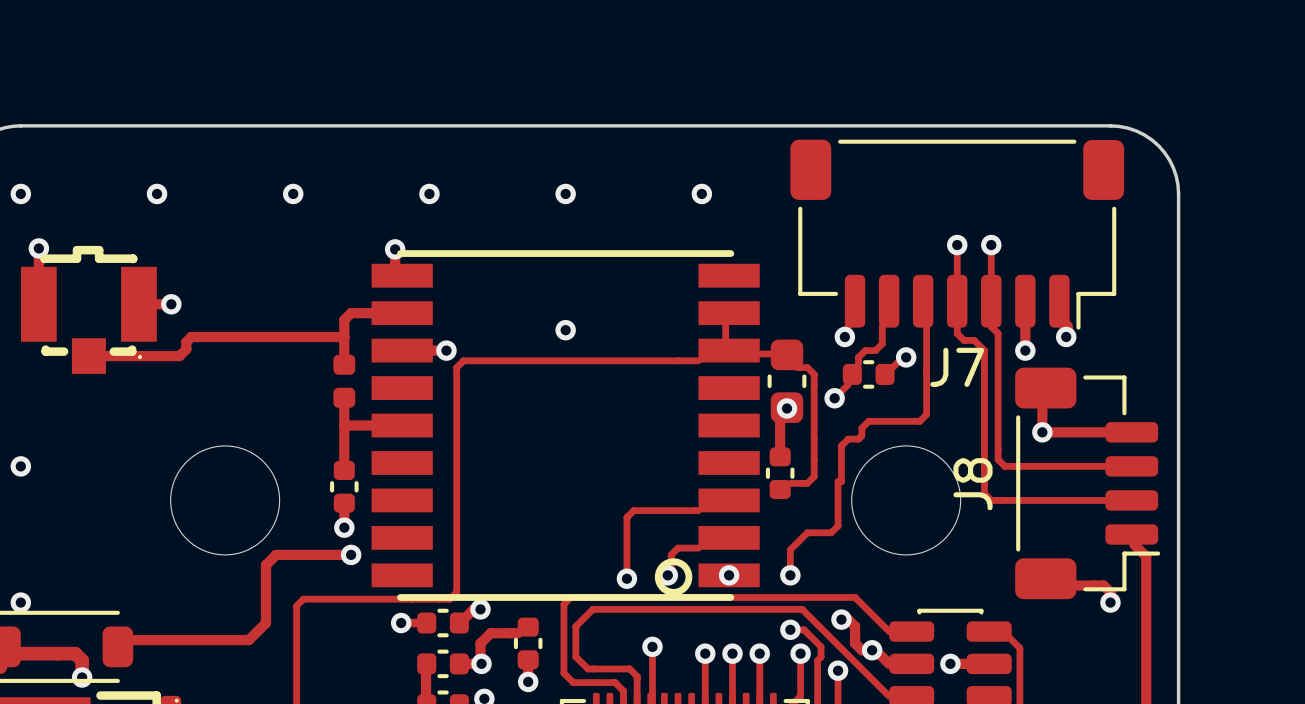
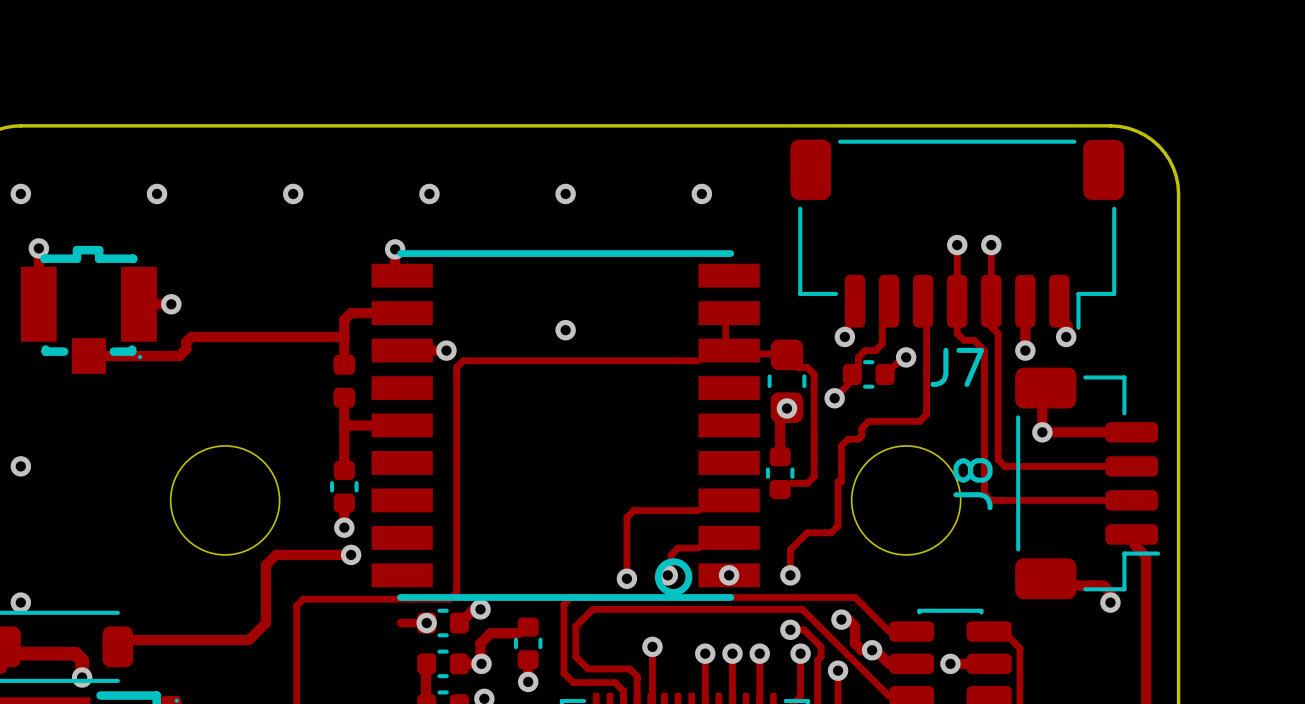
via position: (401, 623) -> (426, 623)

